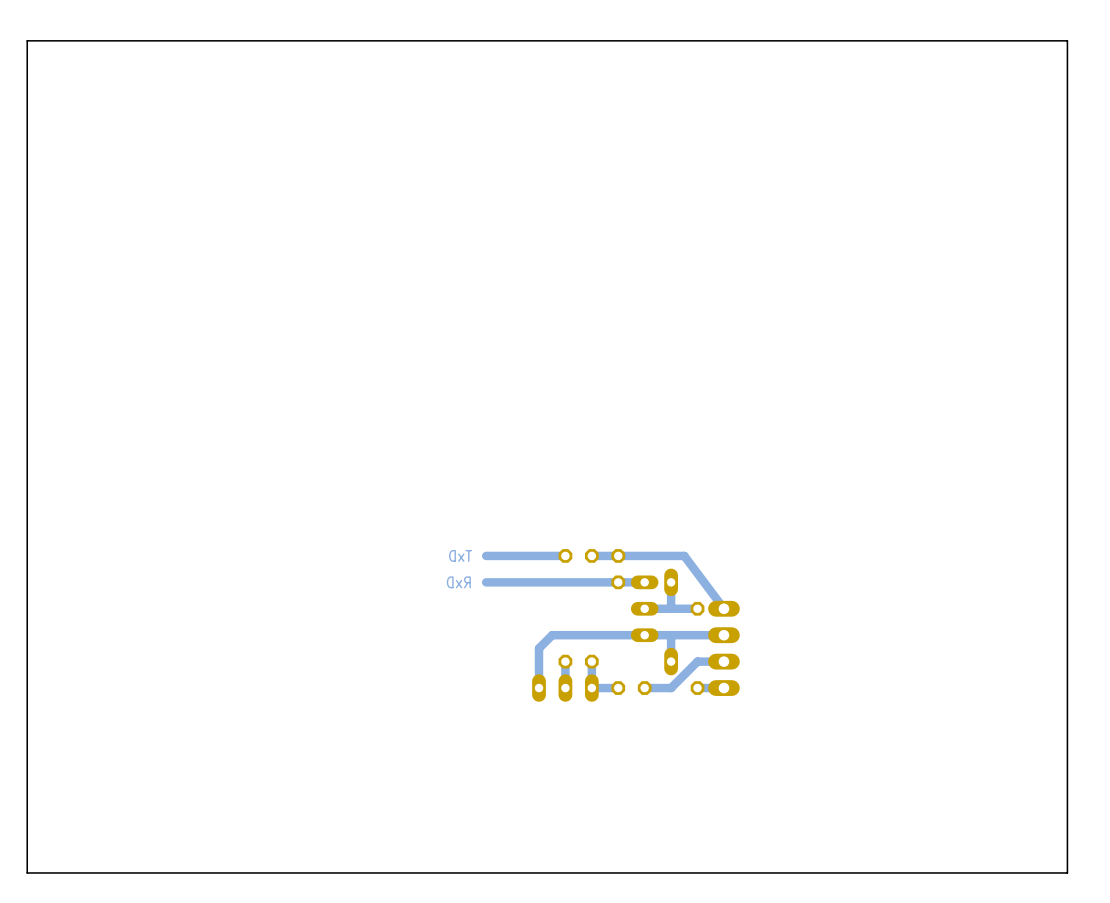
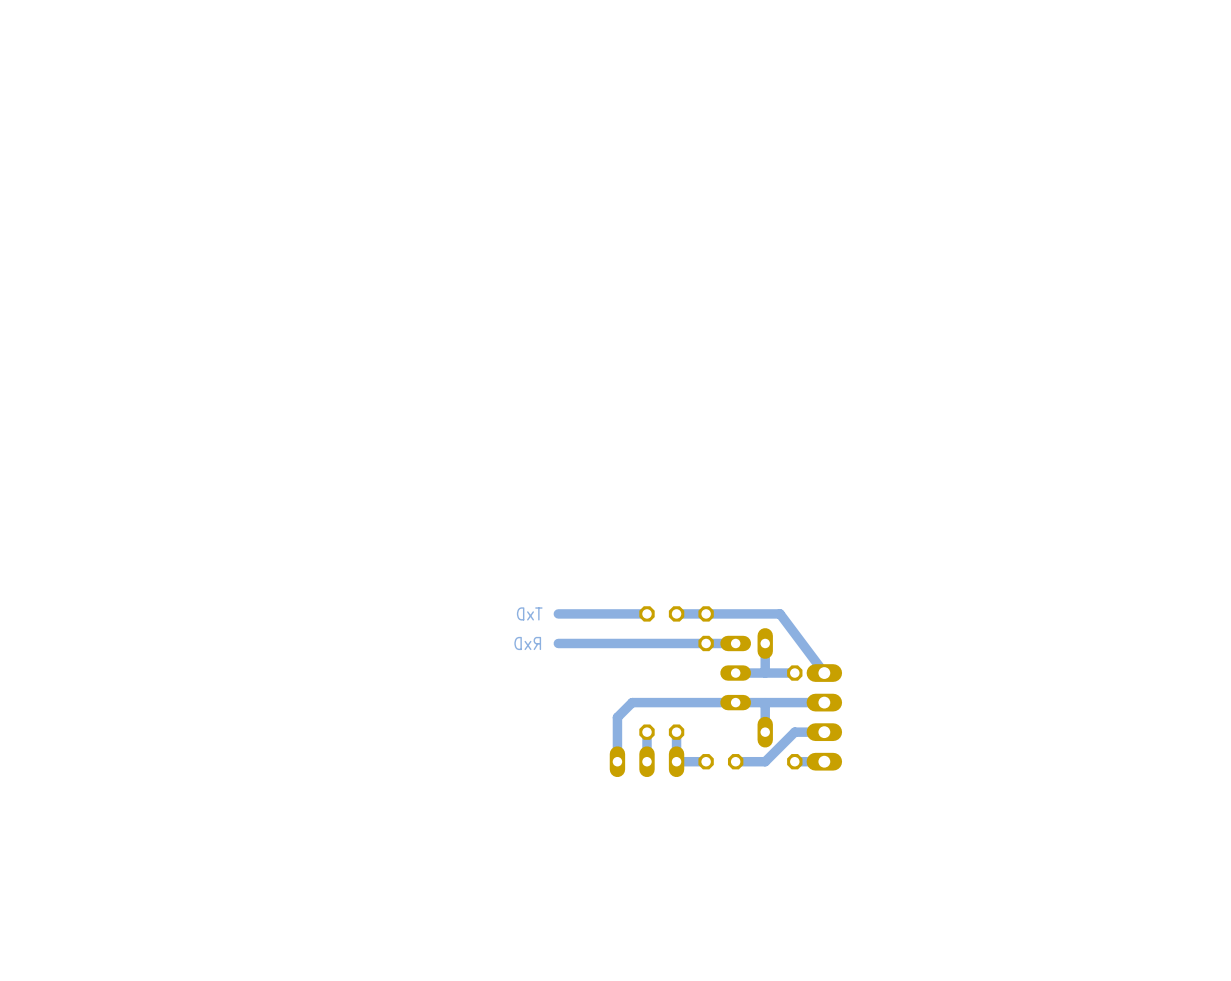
board edge: (1067, 40) (27, 40) (27, 872) (1067, 872) (1067, 40) -> none

